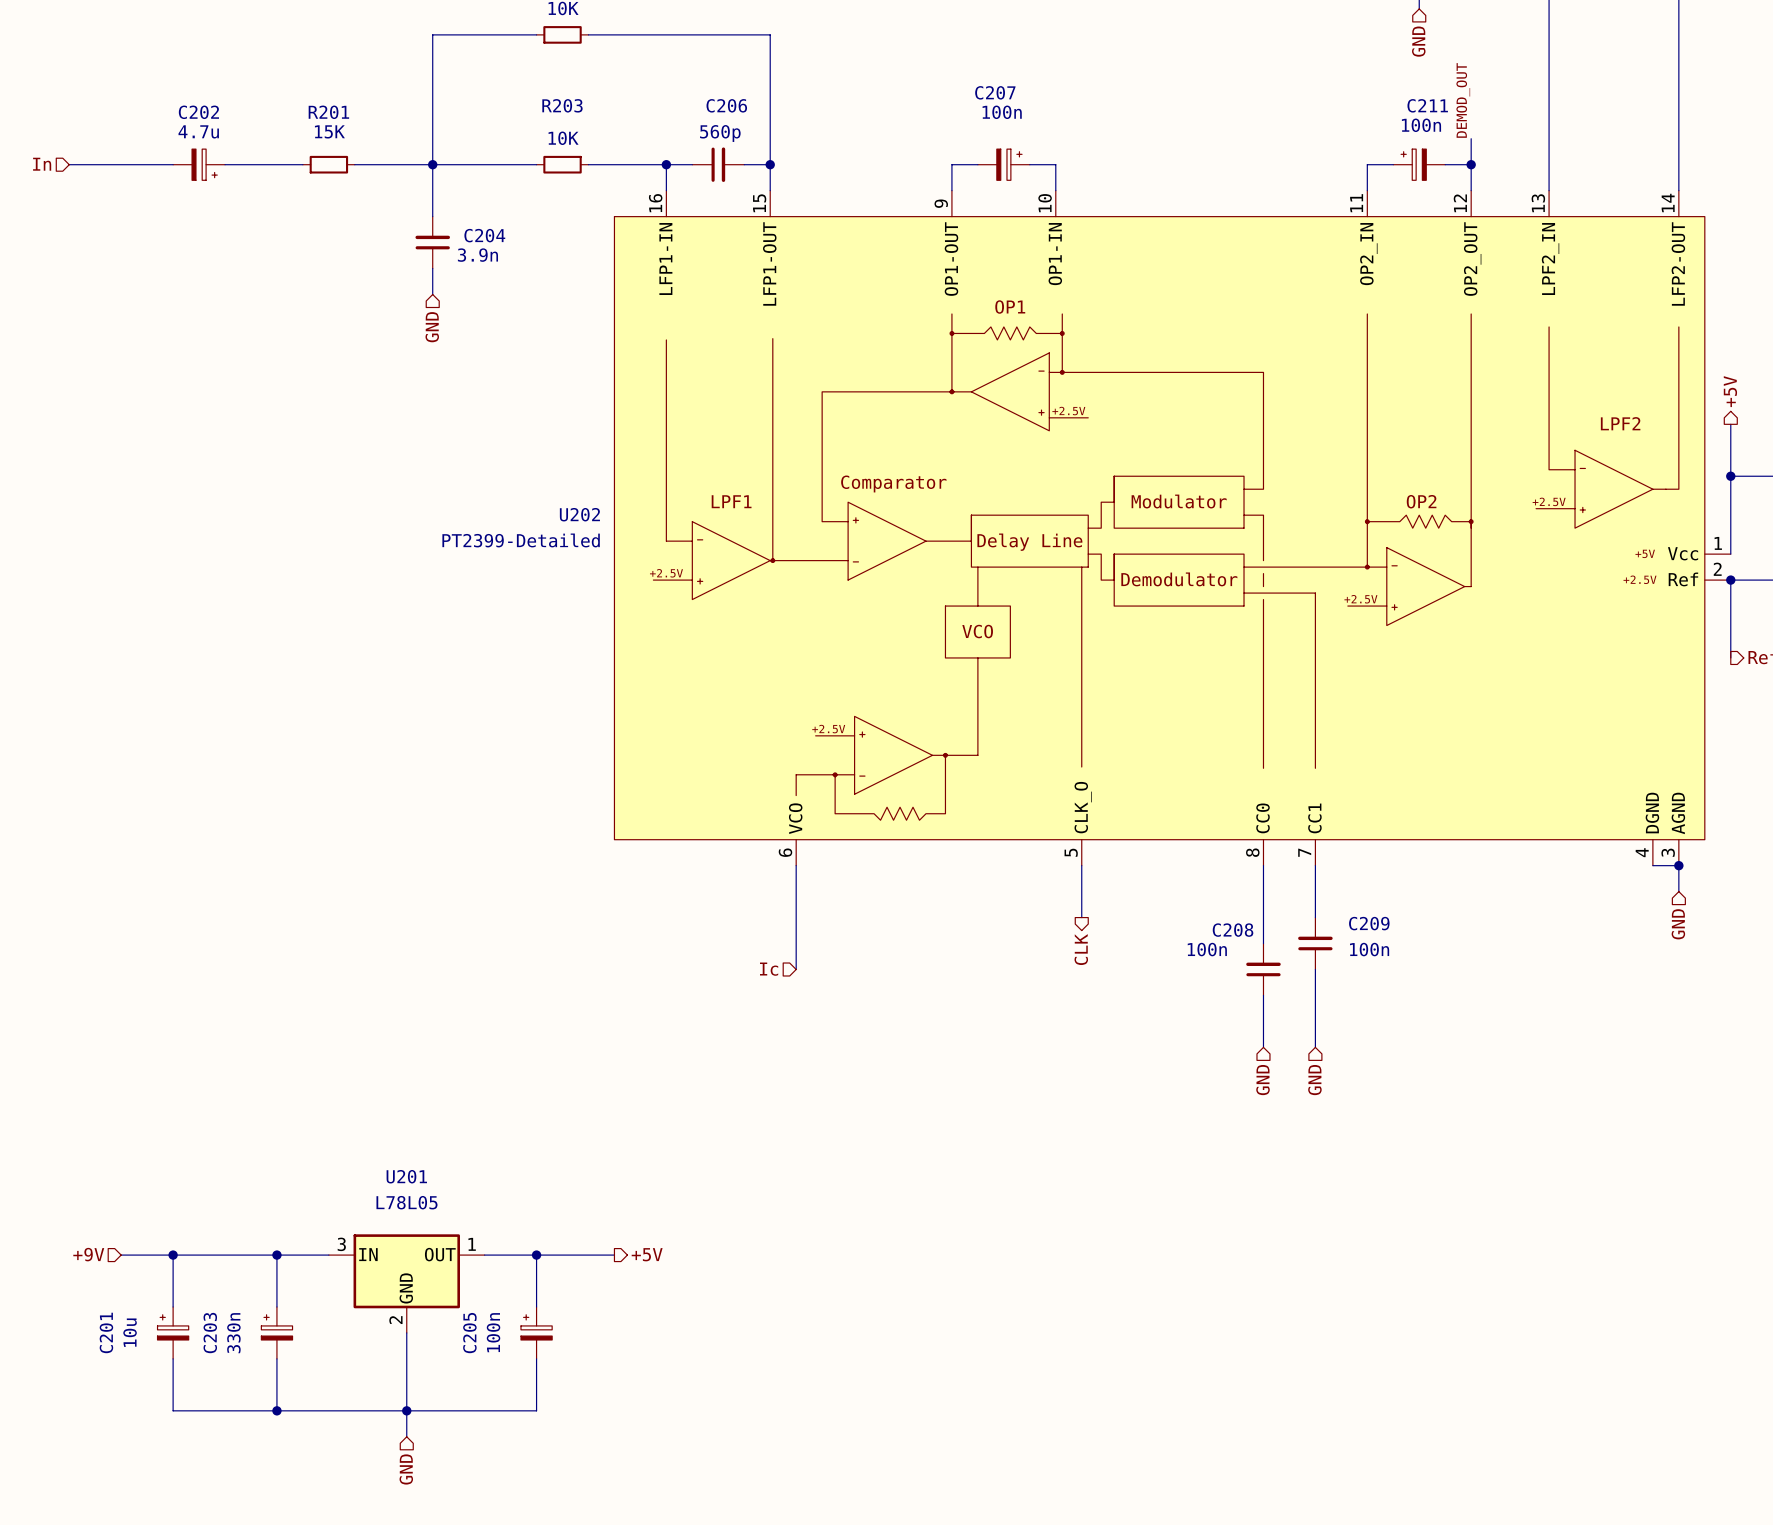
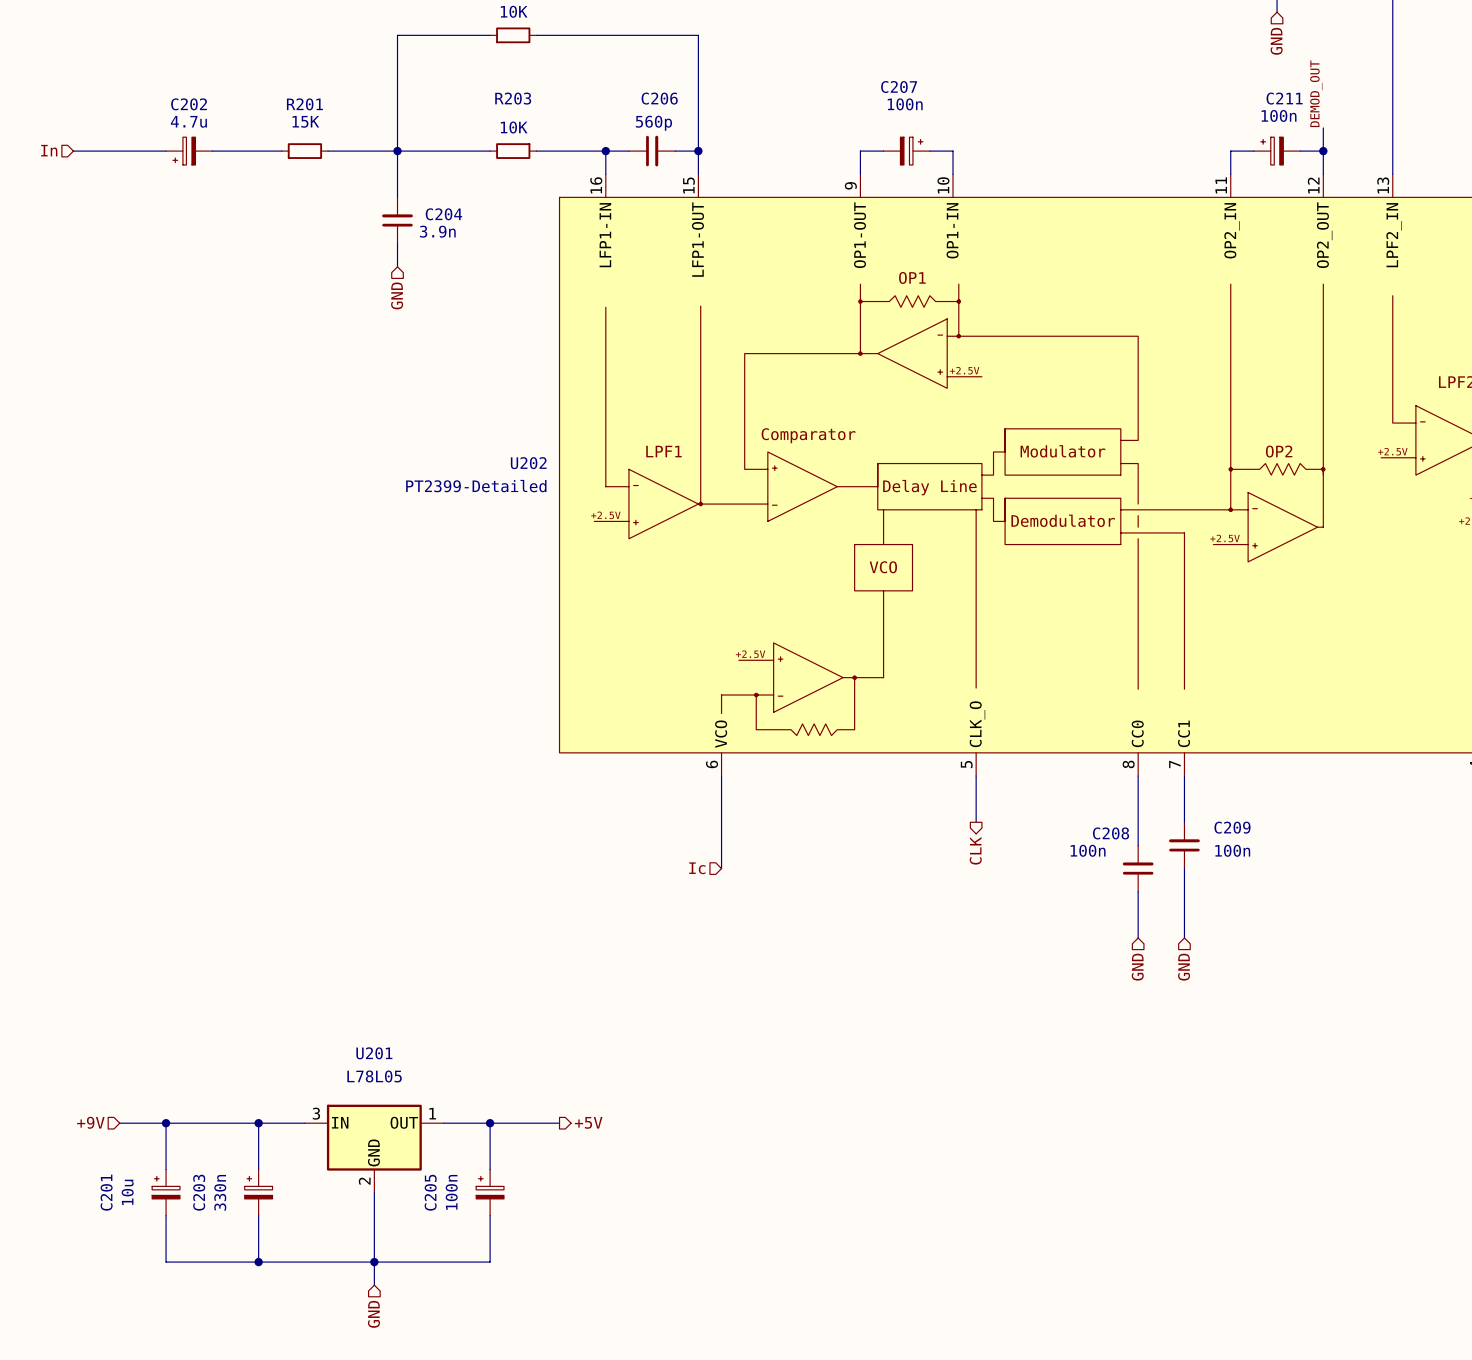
C202 flip: as is (204, 164) -> left-right (184, 151)

